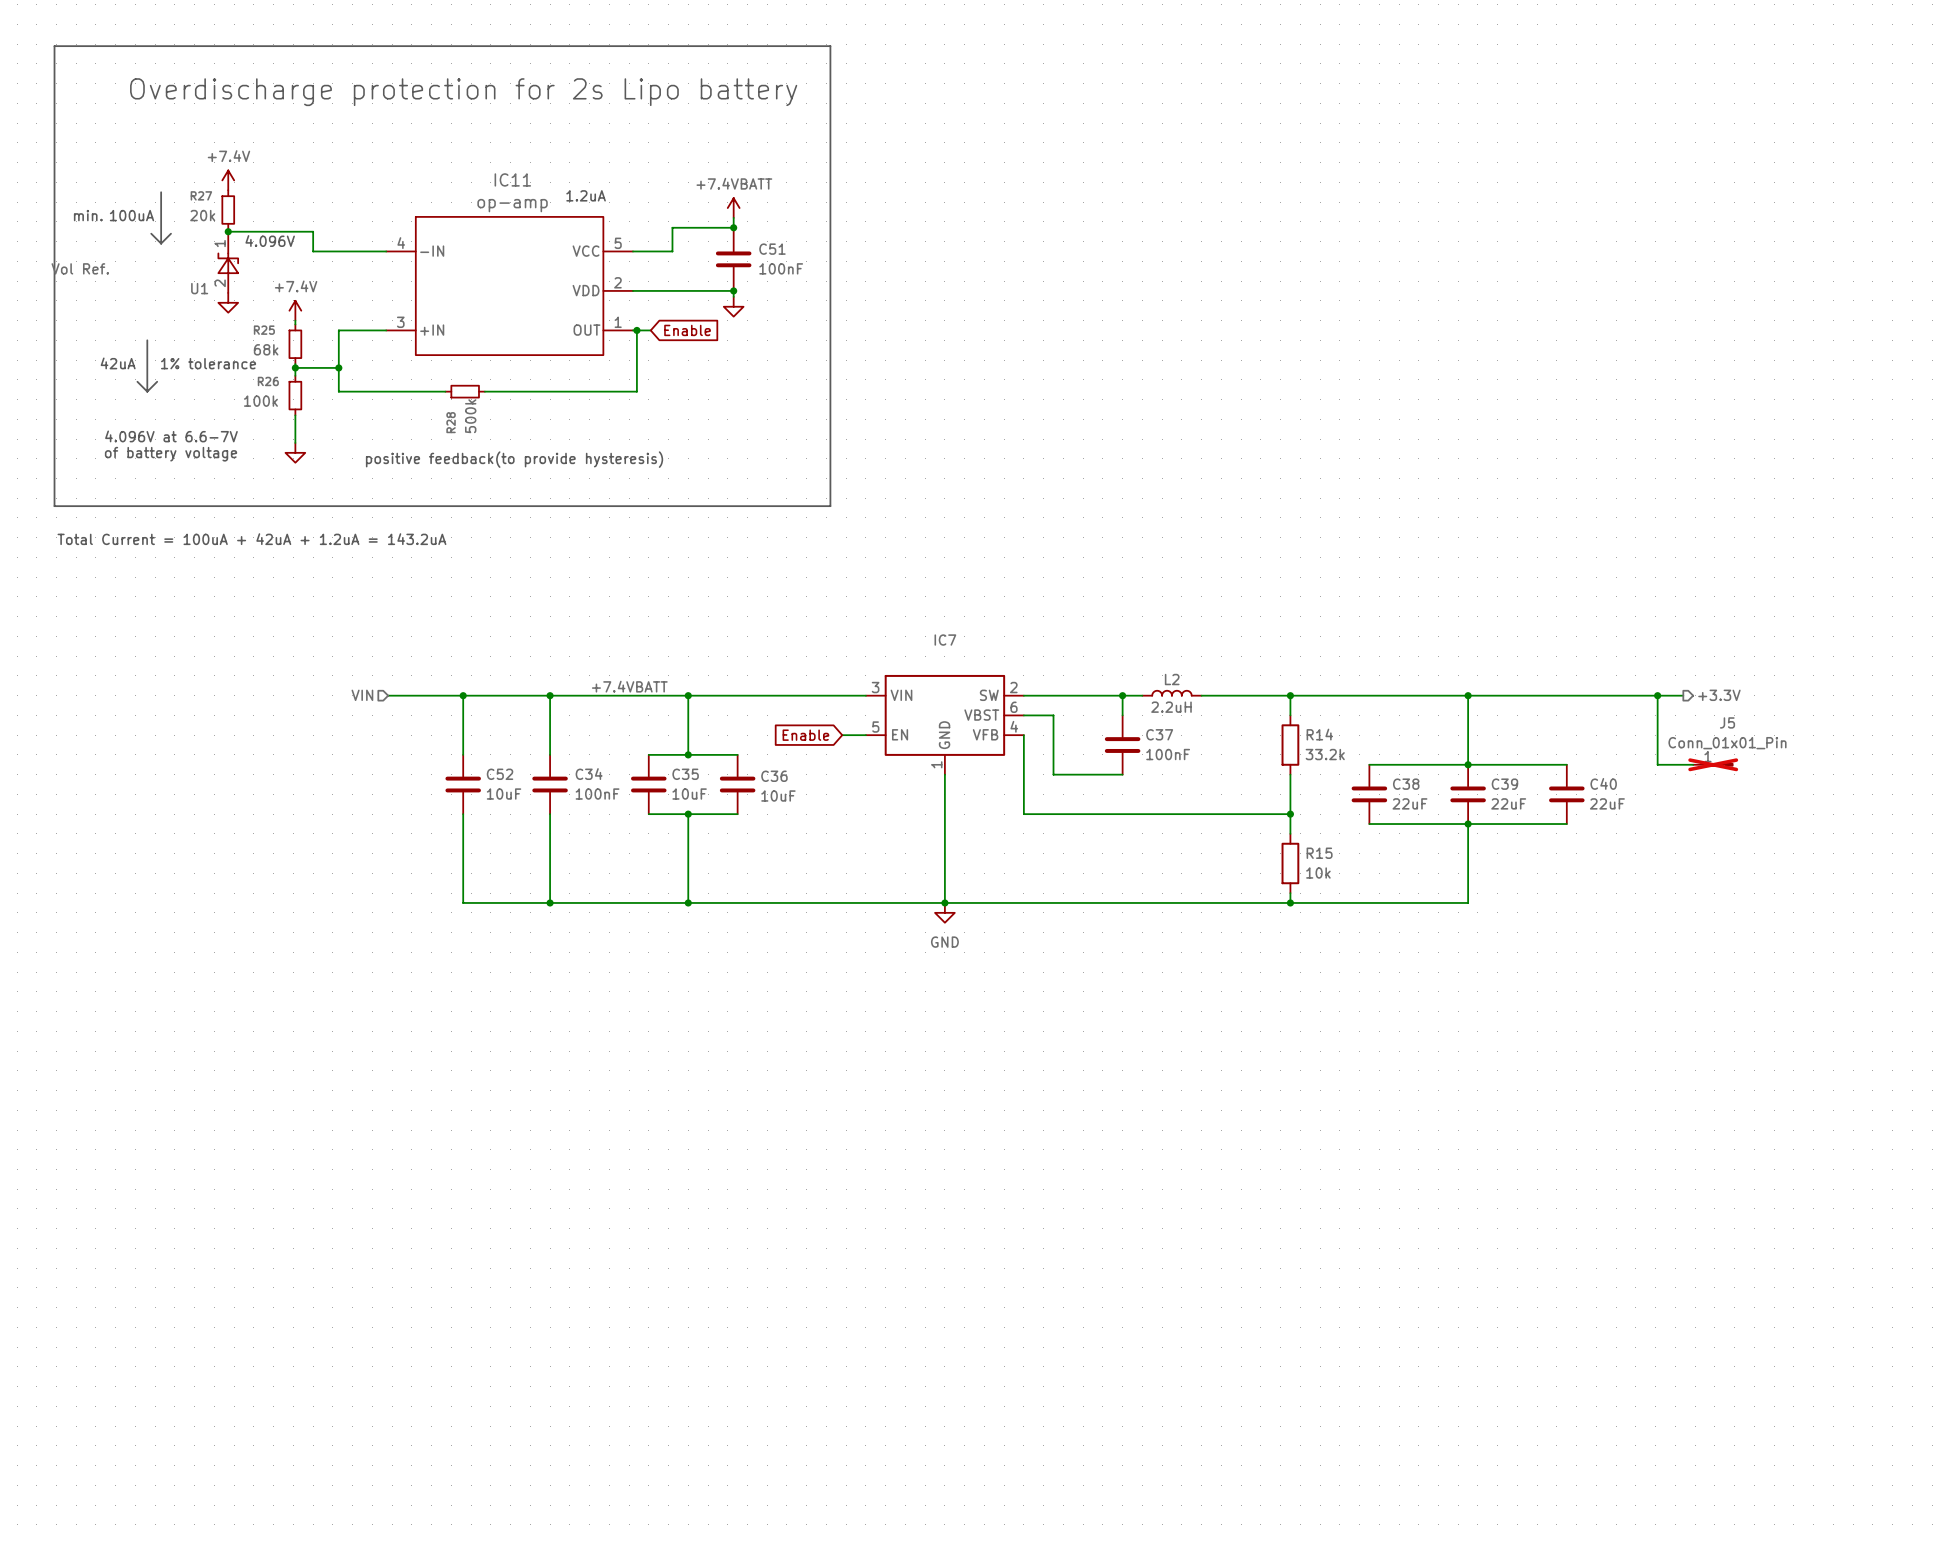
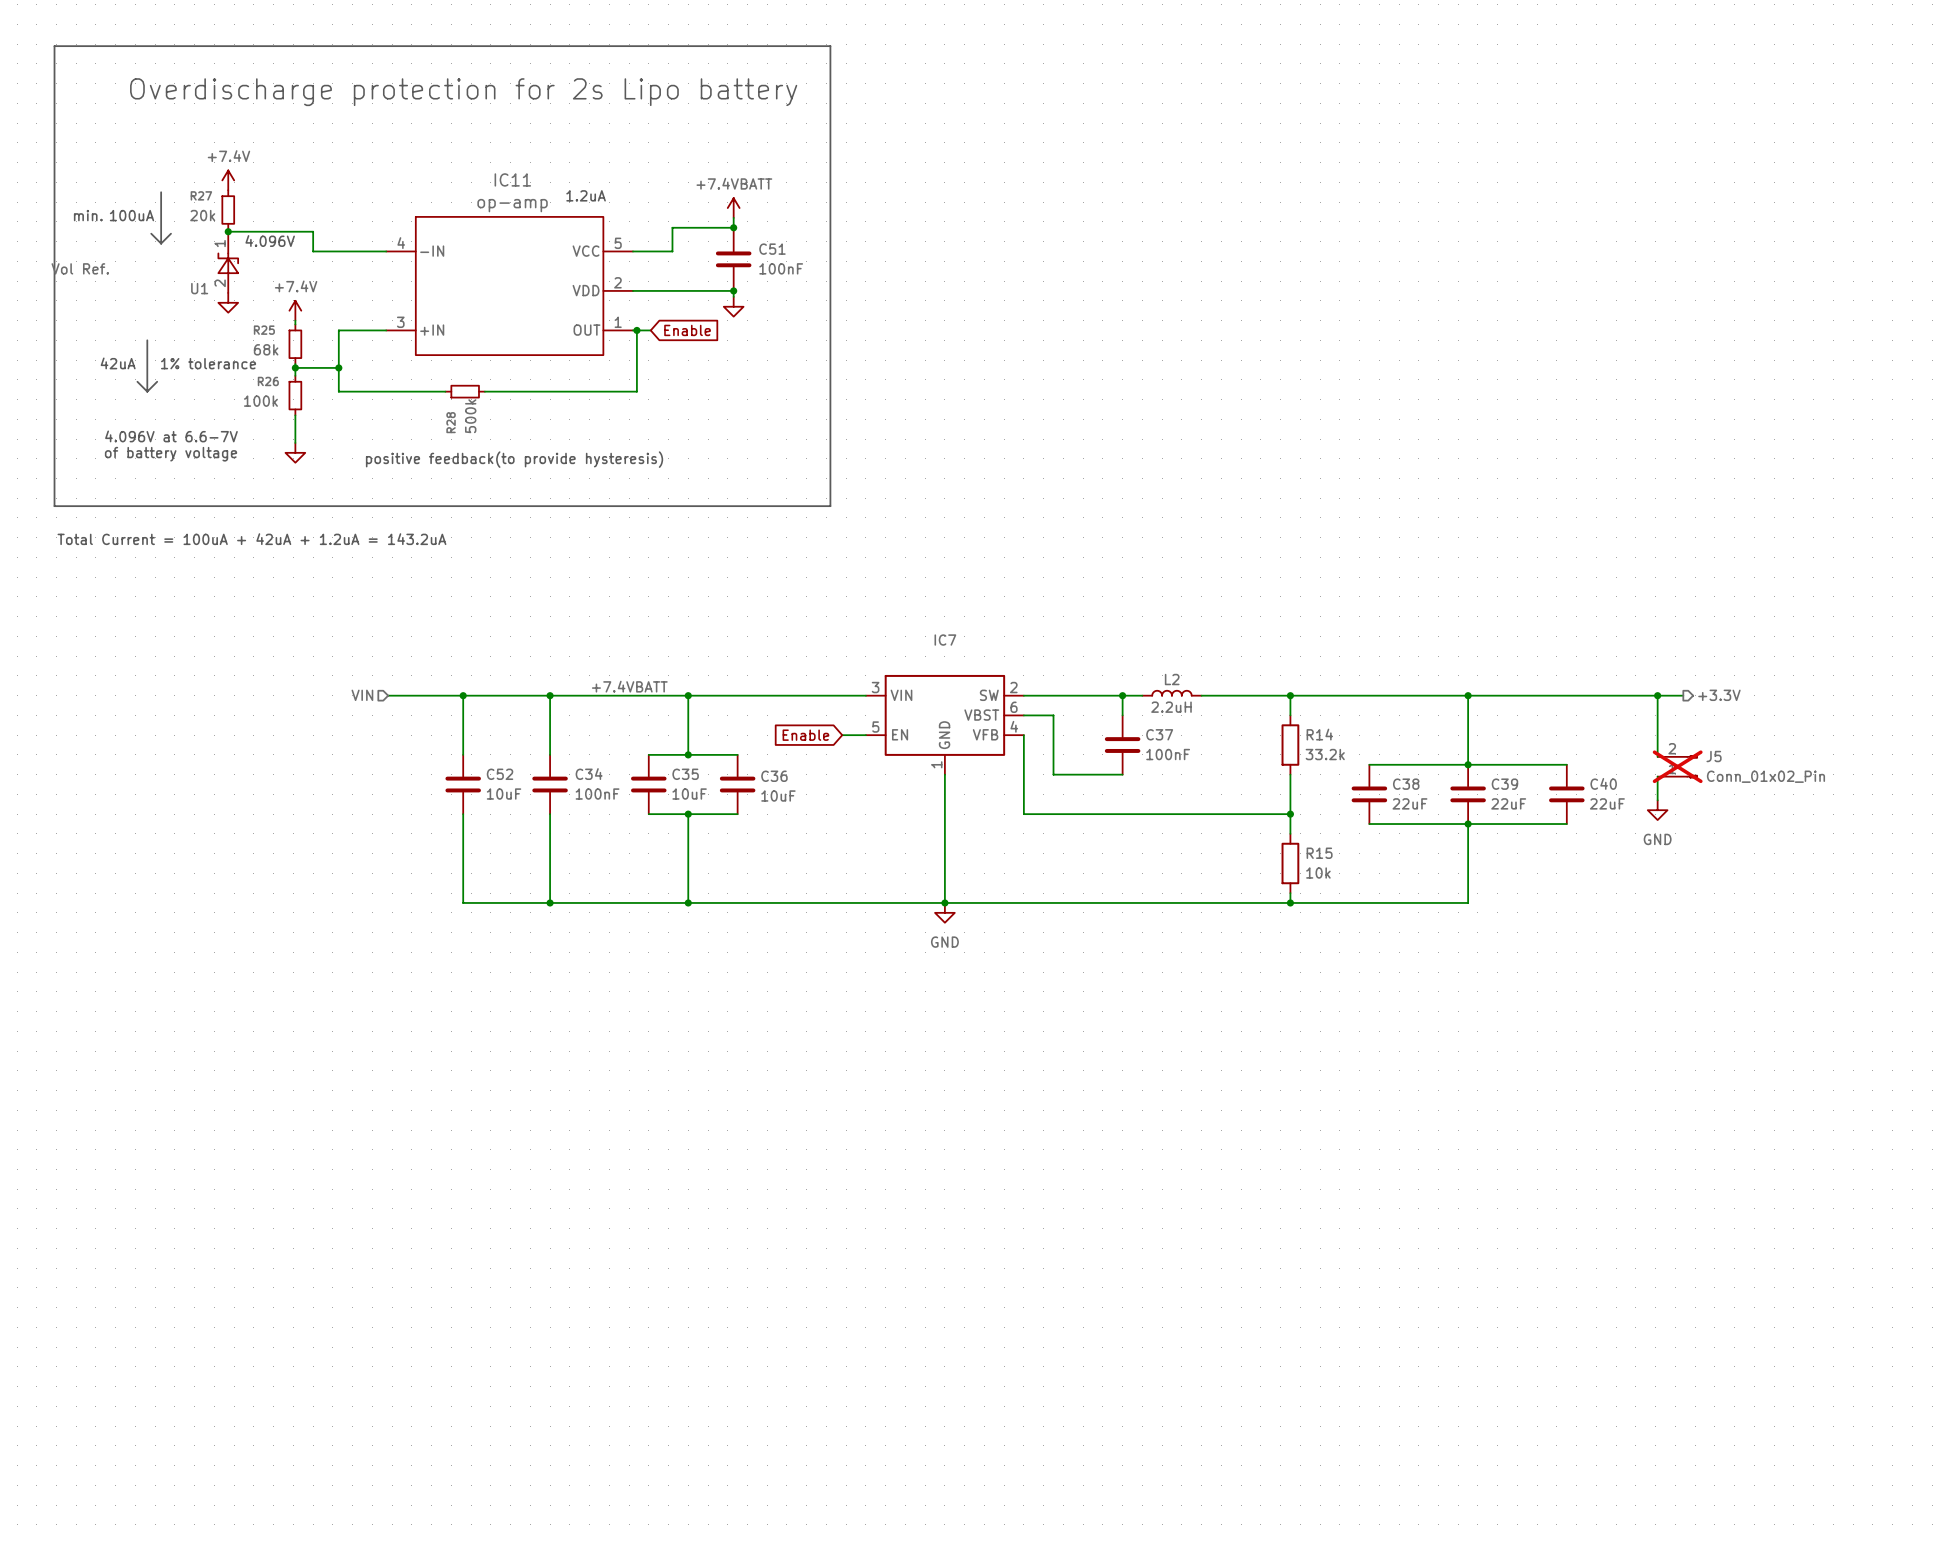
J5 name position: J5 (1727, 722) -> J5 (1714, 756)
J5 value: Conn_01x01_Pin (1727, 743) -> Conn_01x02_Pin (1765, 776)
wire: (1657, 756) (1657, 764) (1693, 764) -> none
J5 symbol: [1693, 763, 1734, 767] -> [1657, 755, 1698, 779]
wire: none -> (1657, 776) (1657, 800)
power symbol: none -> GND (1657, 810)

